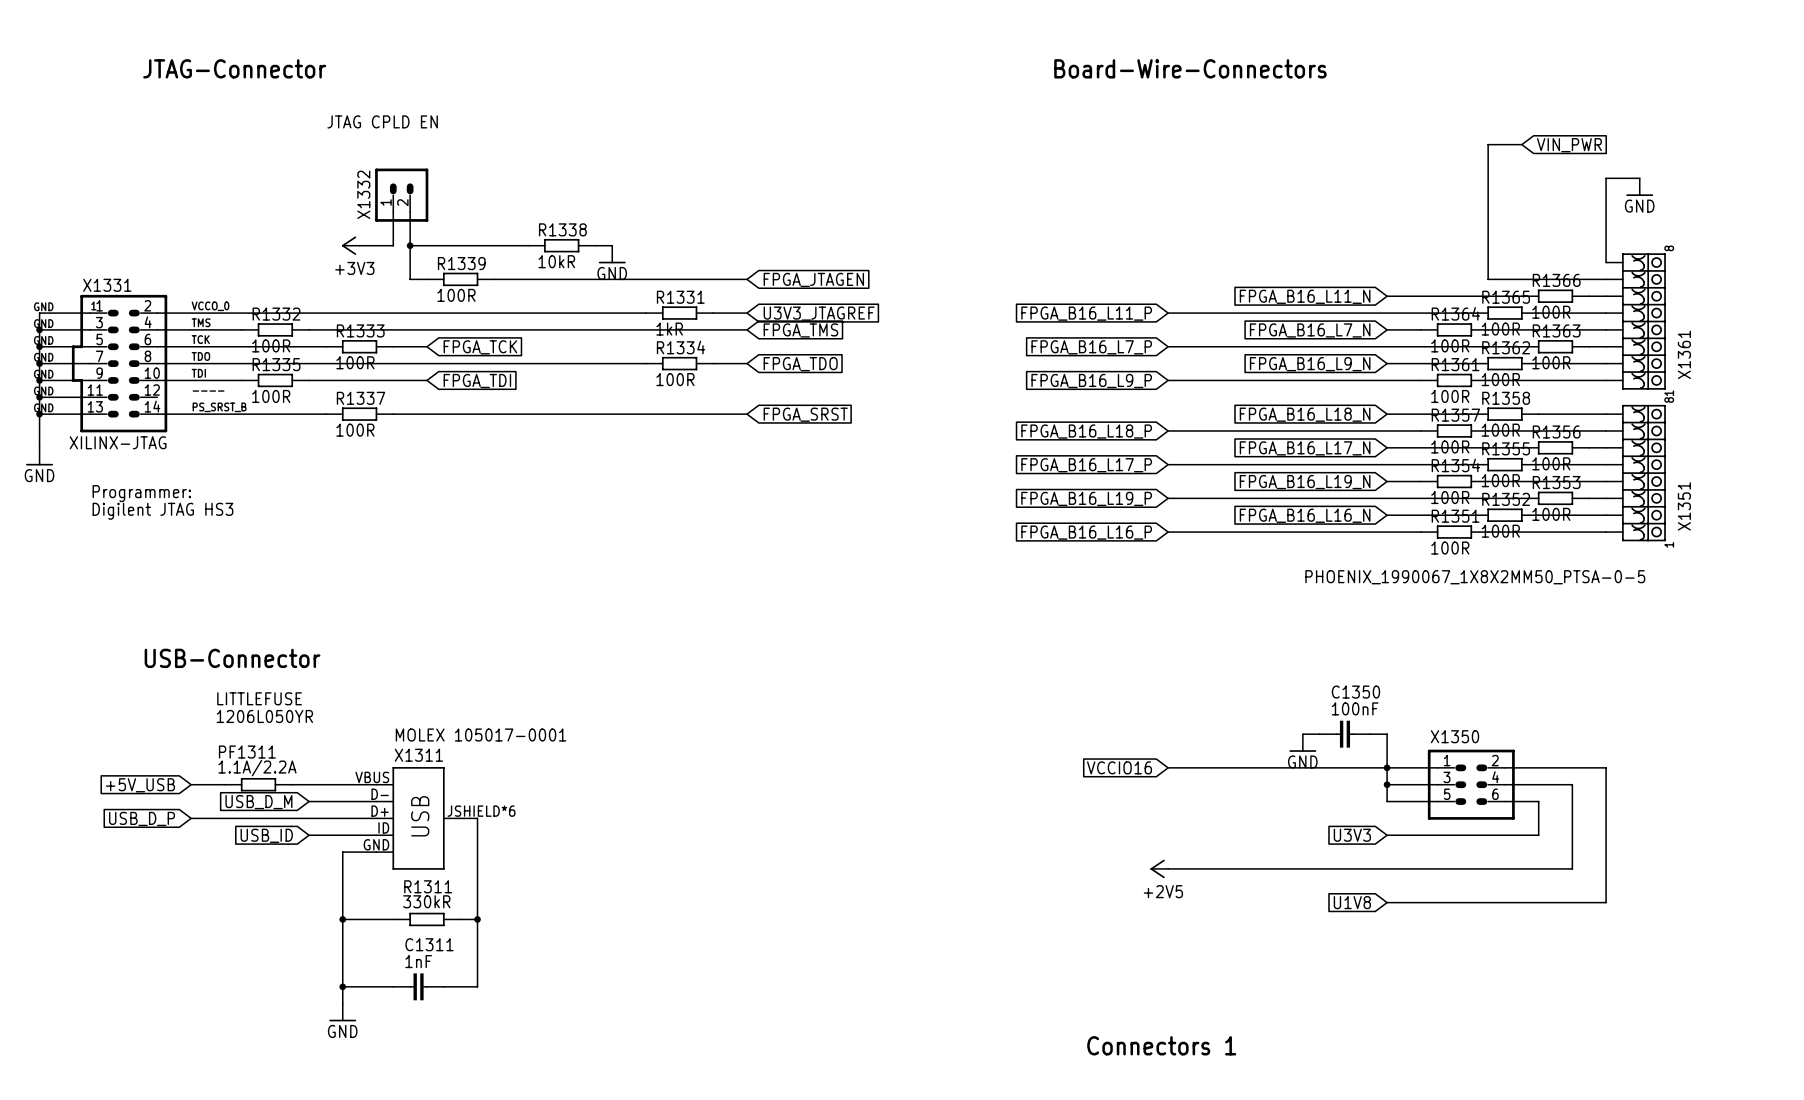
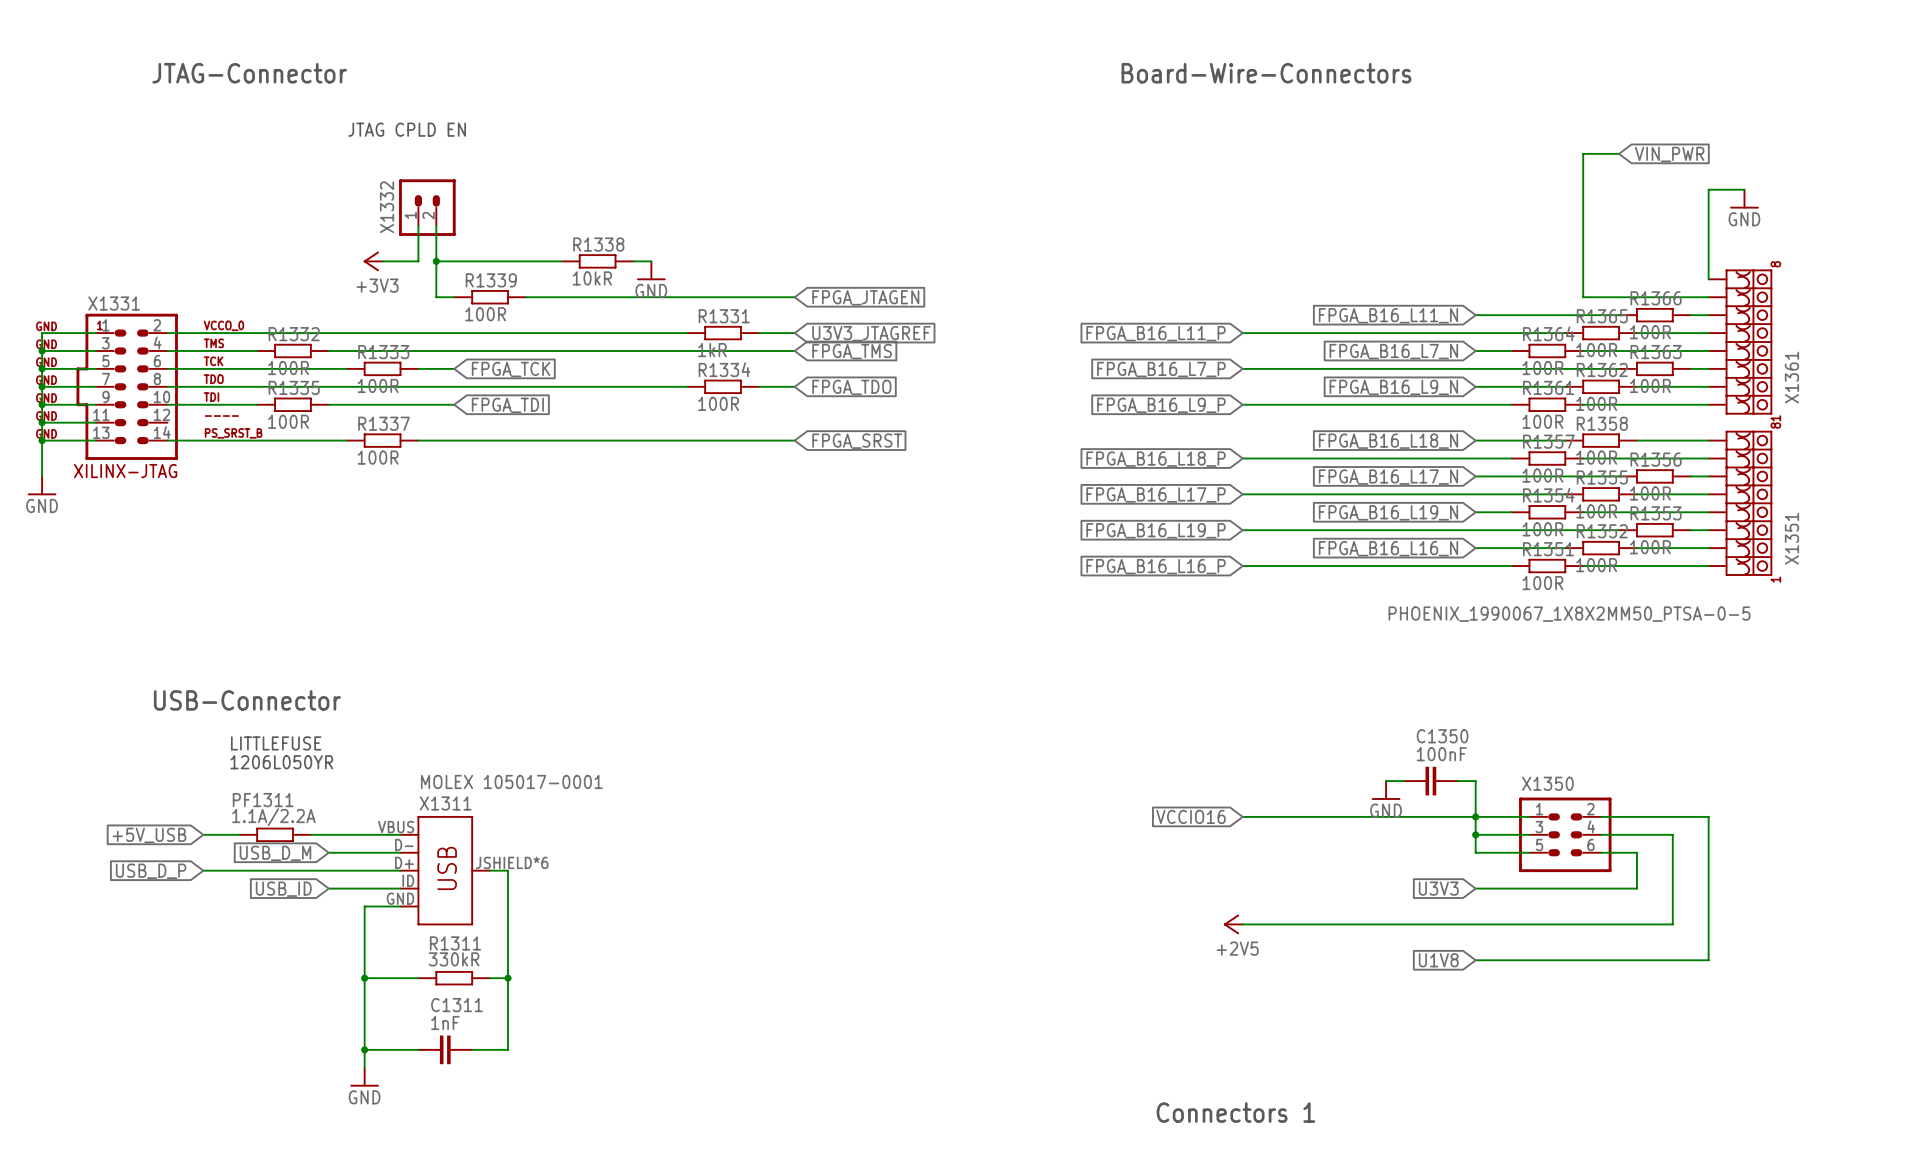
text: Programmer: (141, 493) -> none
text: Digilent JTAG HS3 (162, 511) -> none

